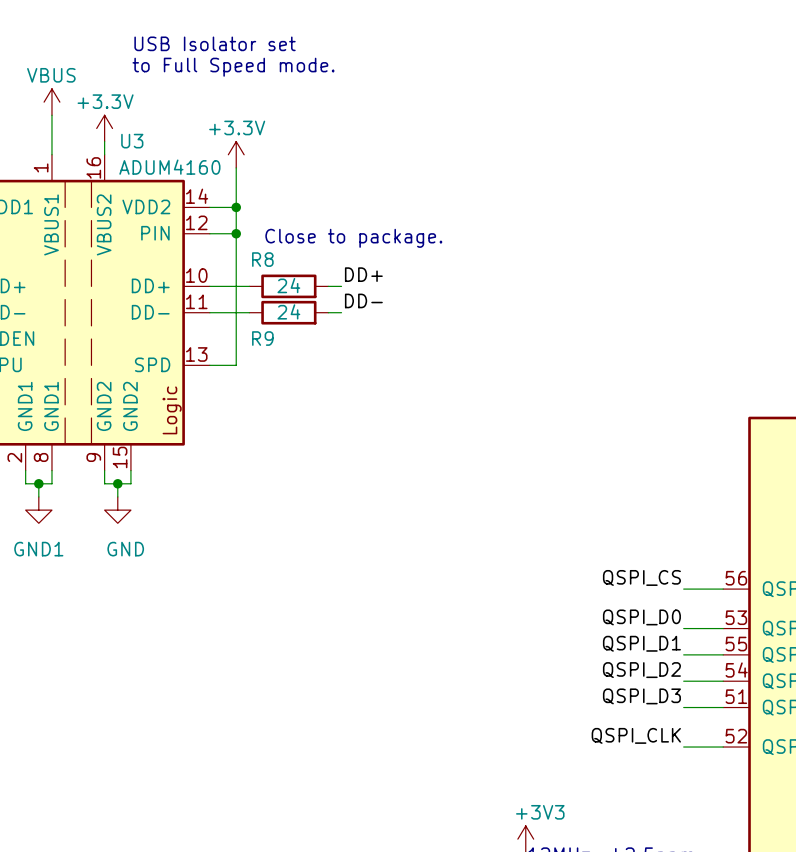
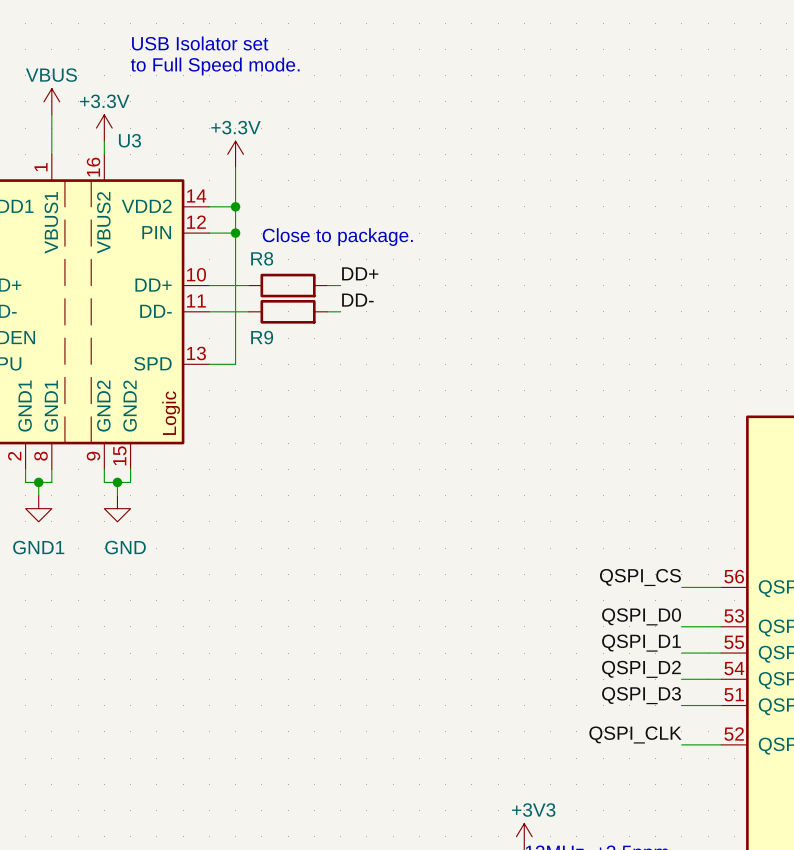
U3 value: ADUM4160 (169, 167) -> none
R8 value: 24 (288, 285) -> none
R9 value: 24 (288, 311) -> none

